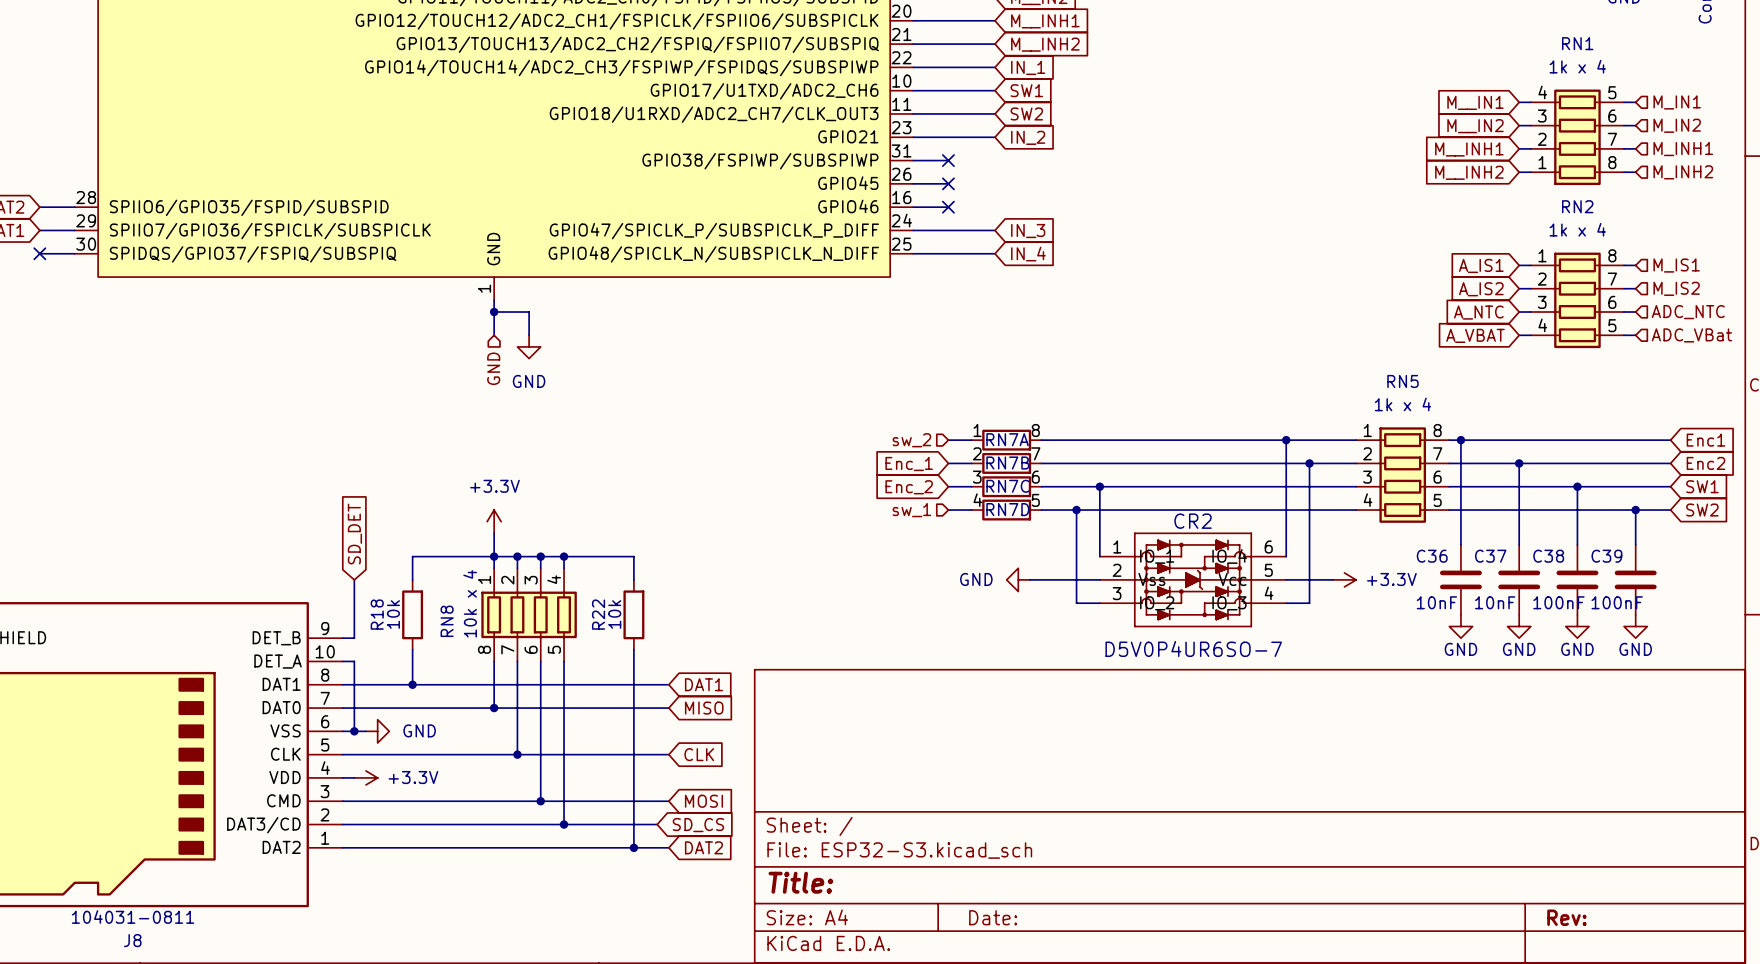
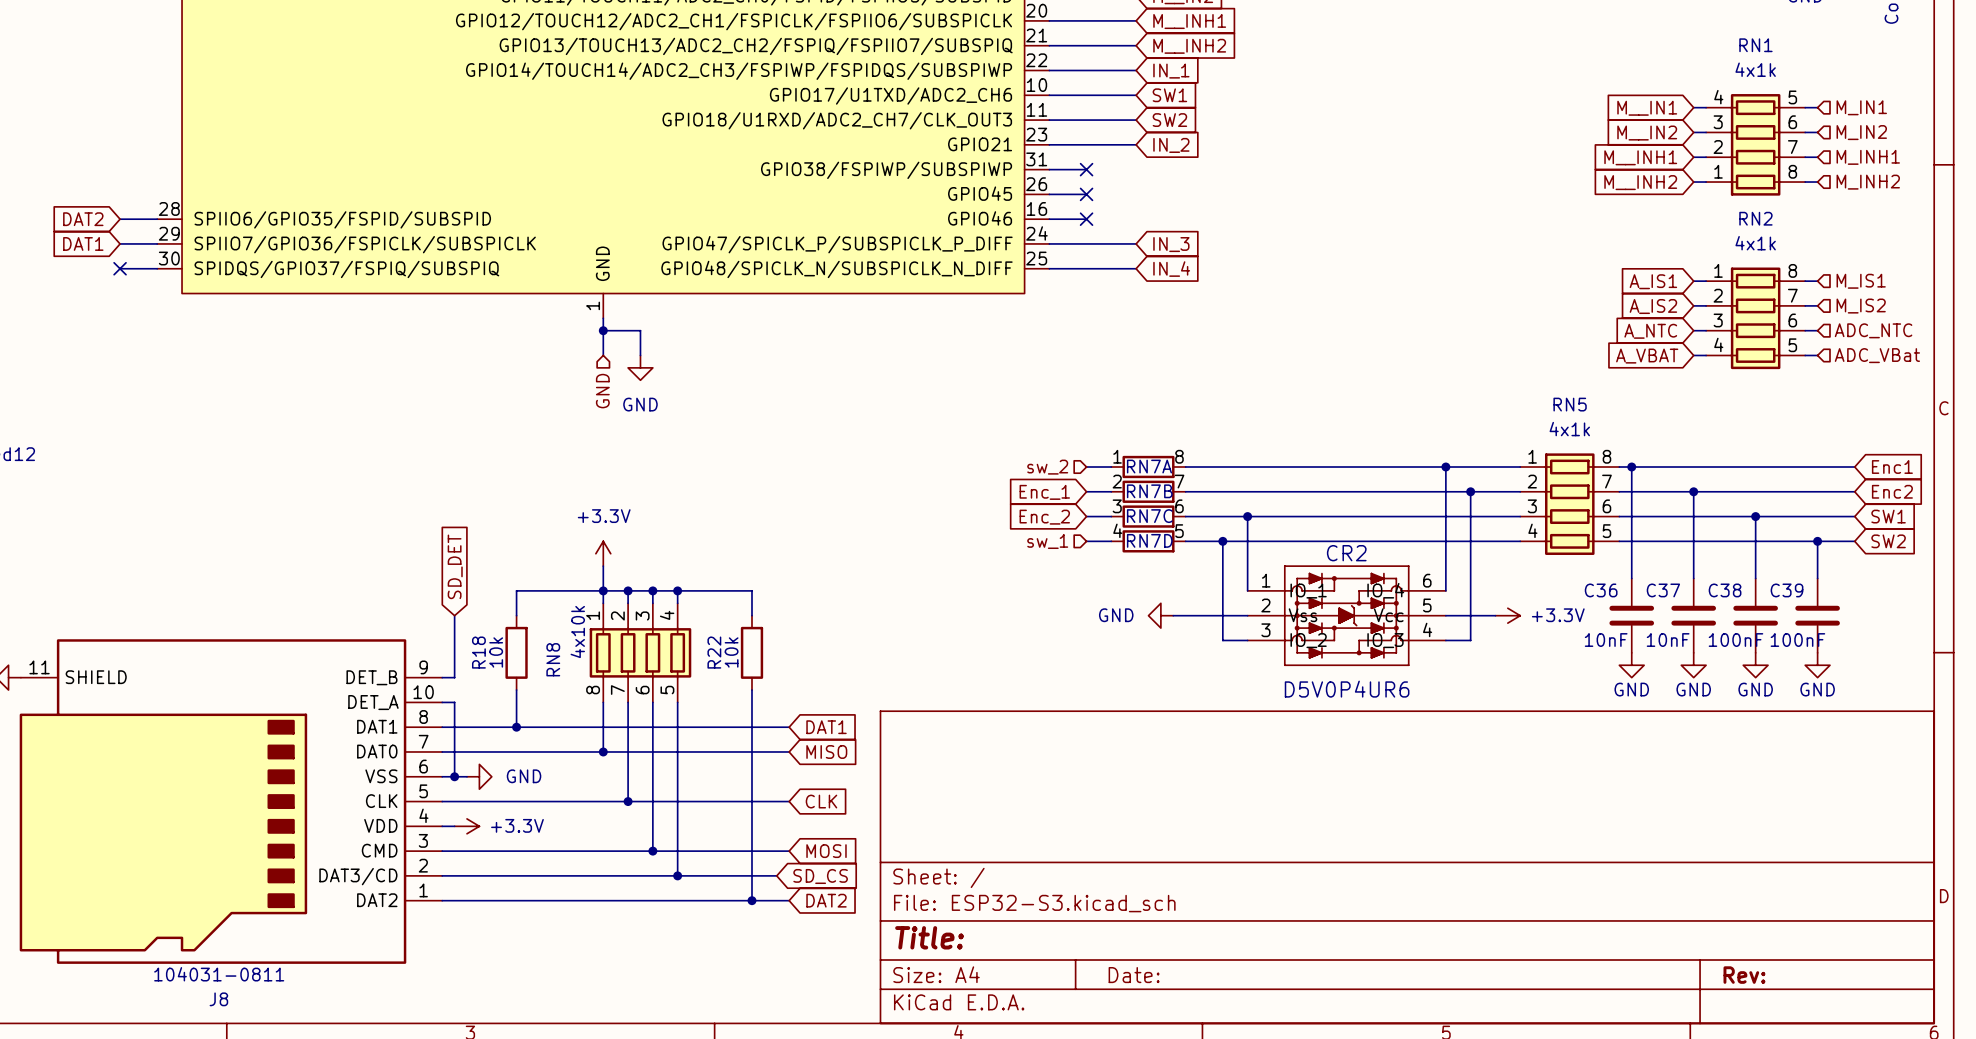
RN1 value: 1k x 4 (1577, 66) -> 4x1k (1755, 69)
RN2 value: 1k x 4 (1577, 229) -> 4x1k (1755, 243)
RN5 value: 1k x 4 (1402, 404) -> 4x1k (1569, 429)
RN8 value: 10k x 4 (470, 603) -> 4x10k (577, 632)
CR2 value: D5V0P4UR6SO-7 (1193, 648) -> D5V0P4UR6 (1347, 689)

